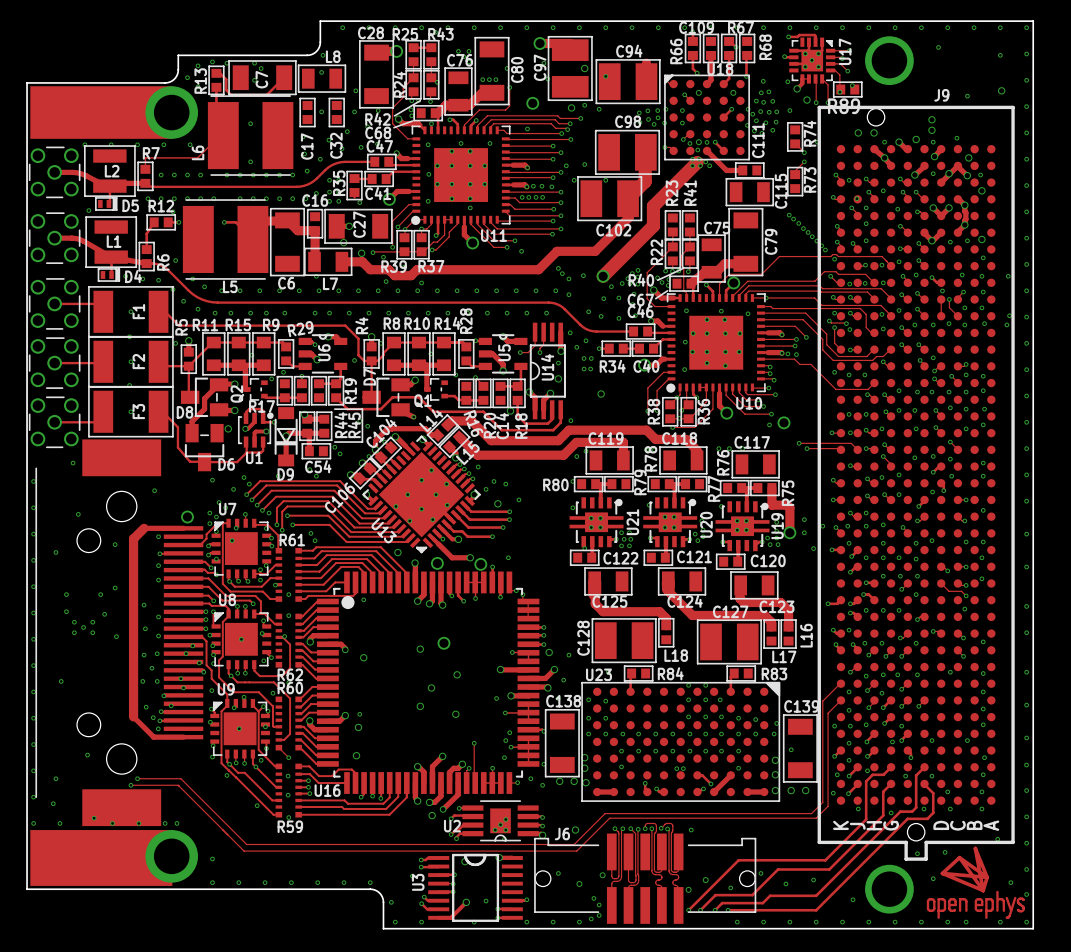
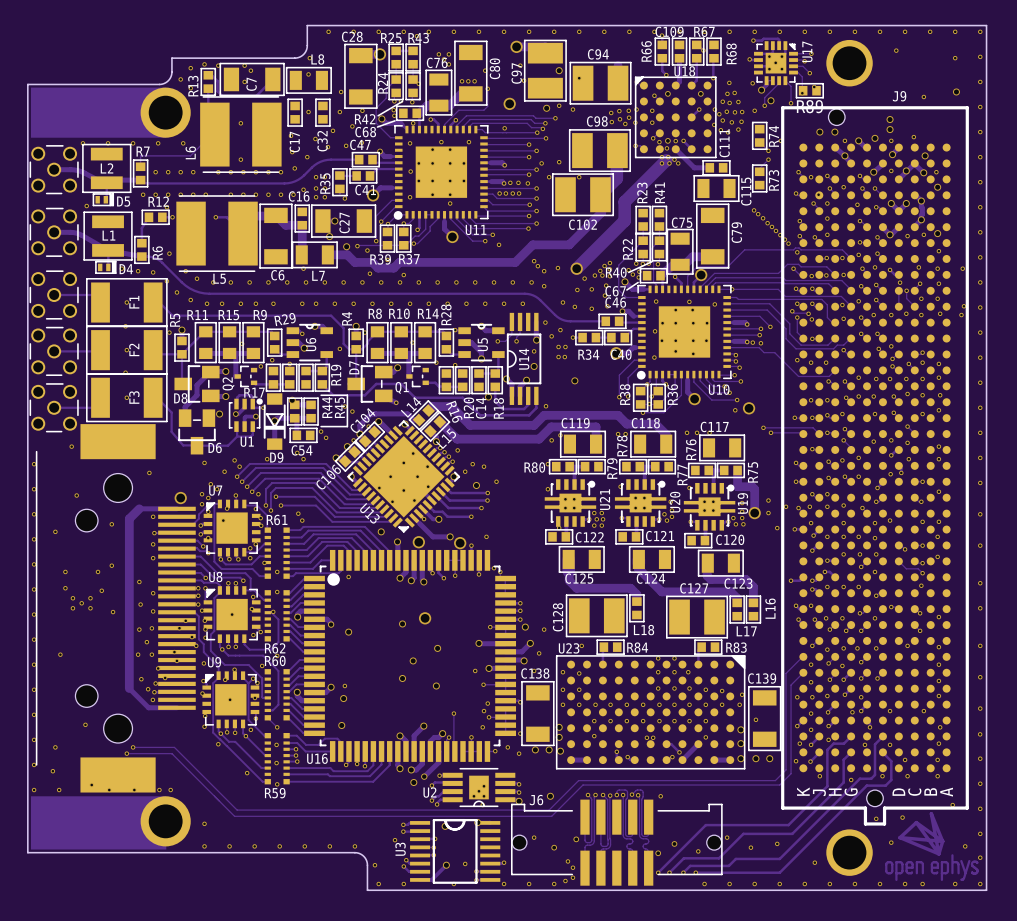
track: (815, 79) (816, 102) -> (779, 80) (764, 97) (764, 105)
via position: (816, 102) -> (764, 105)

